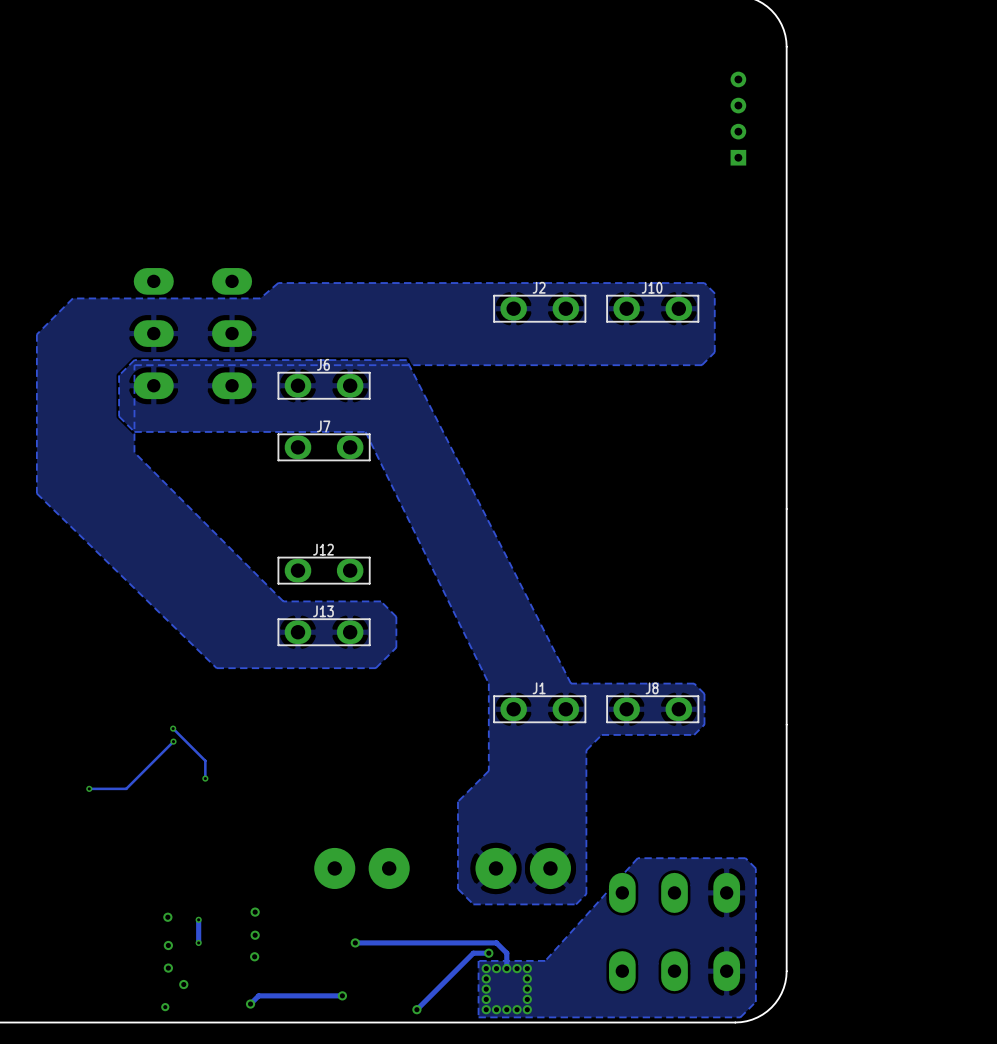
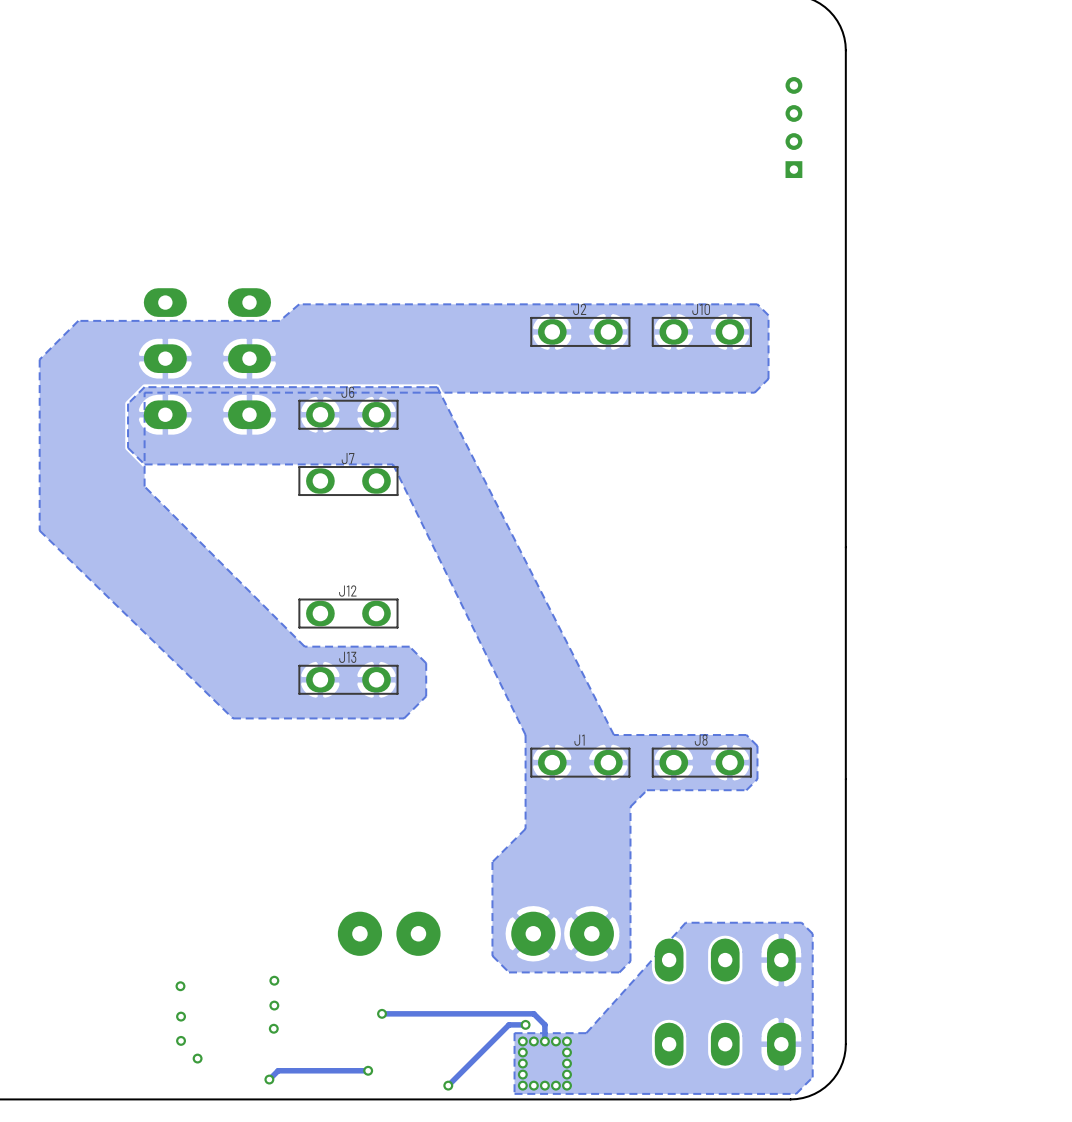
track: (173, 728) (205, 760) (205, 778) -> none
via: (173, 728) -> none
track: (173, 741) (126, 788) (89, 788) -> none
via: (173, 741) -> none
via: (205, 778) -> none
via: (89, 788) -> none
track: (198, 919) (198, 942) -> none
via: (198, 919) -> none
via: (198, 942) -> none
via: (165, 1007) -> none

